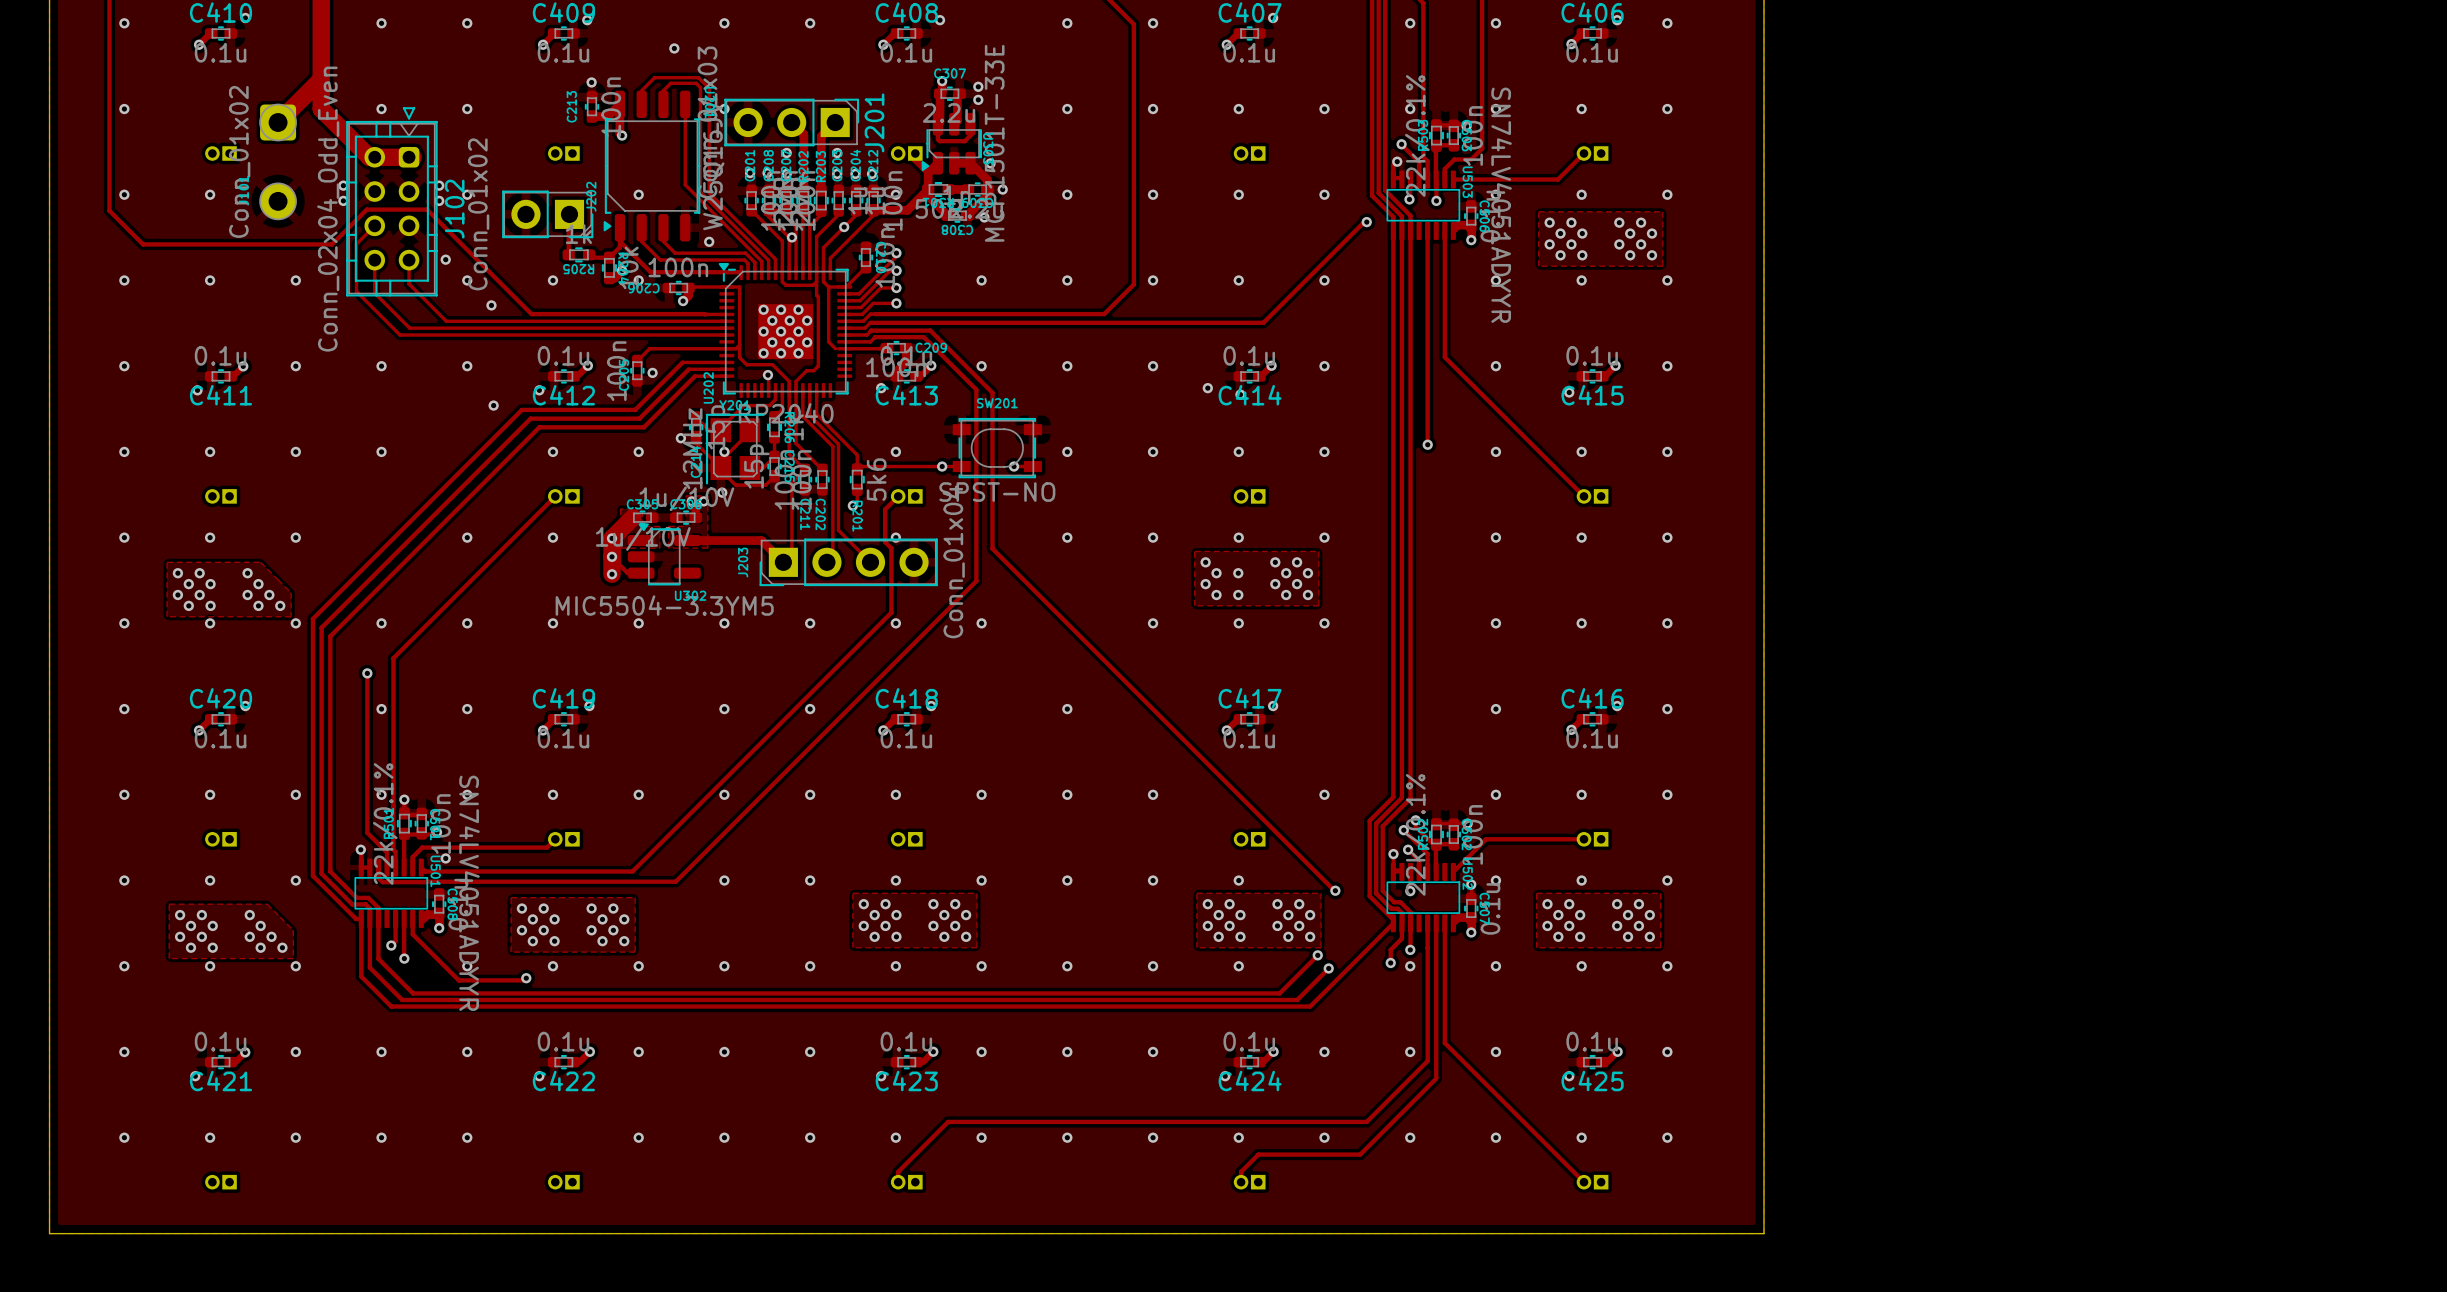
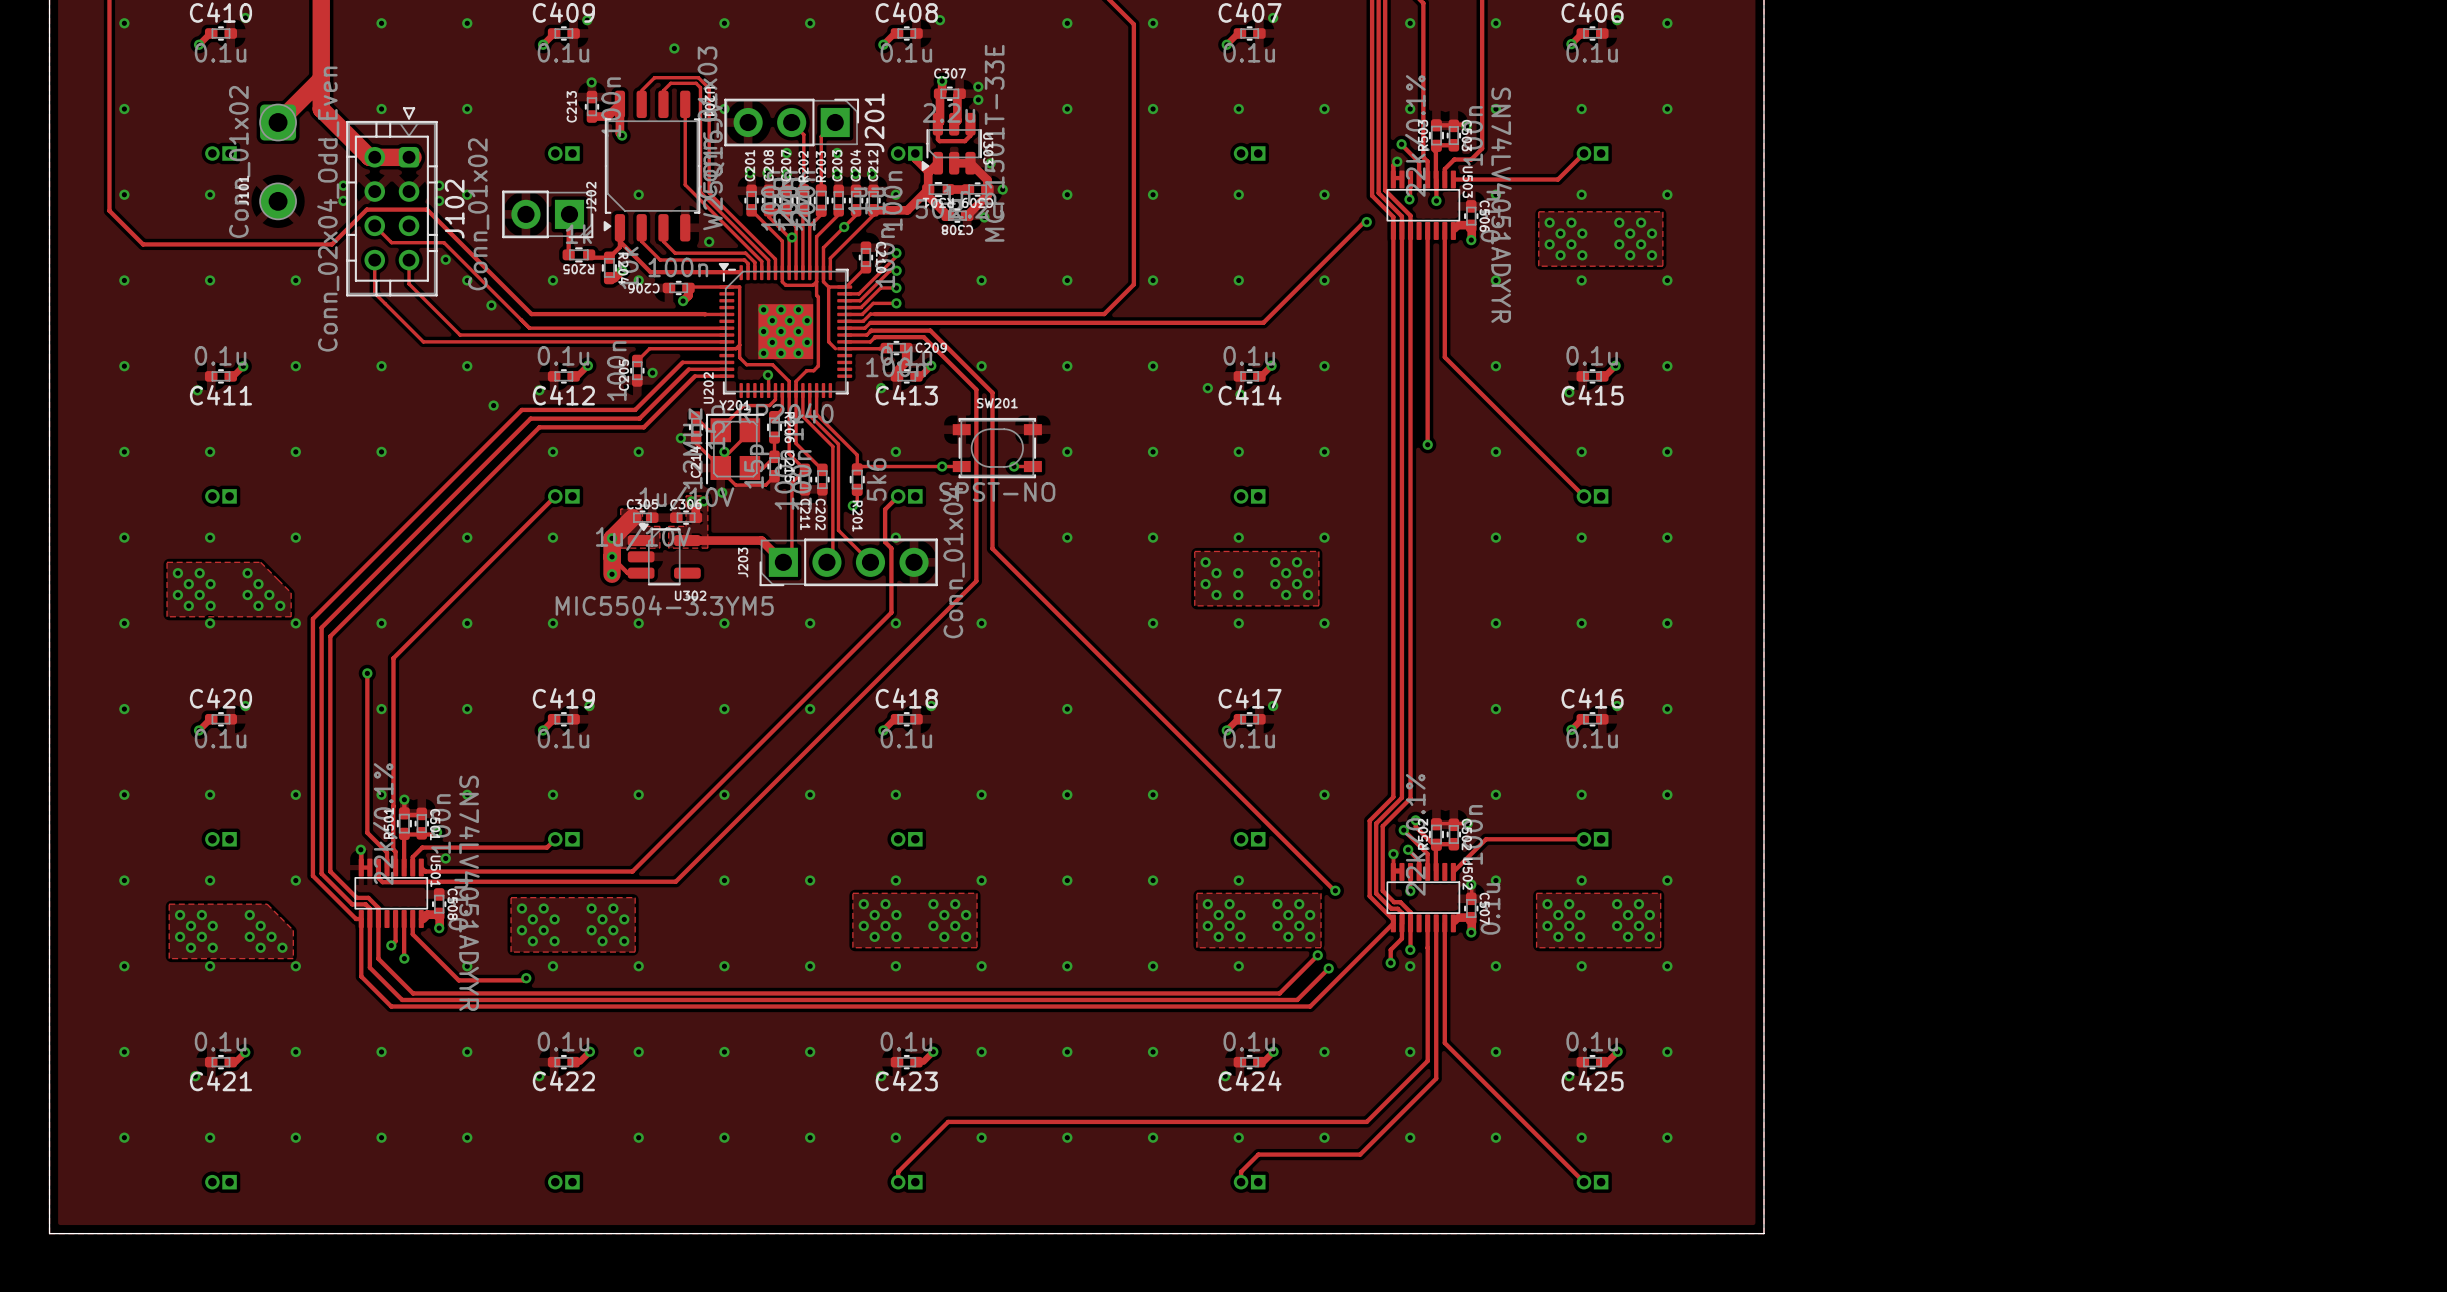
track width: thick (791, 122) (803, 134) (803, 190) -> thin (791, 122) (803, 134) (803, 190)
track width: thick (835, 122) (821, 136) (821, 190) -> thin (835, 122) (821, 136) (821, 190)
track: (374, 225) (356, 244) (356, 291) (400, 335) (460, 335) -> (374, 225) (391, 242) (444, 242) (529, 328)
track: (446, 321) (726, 321) -> (446, 321) (460, 335)
track: (409, 328) (529, 328) -> (409, 328) (423, 341) (726, 341)

